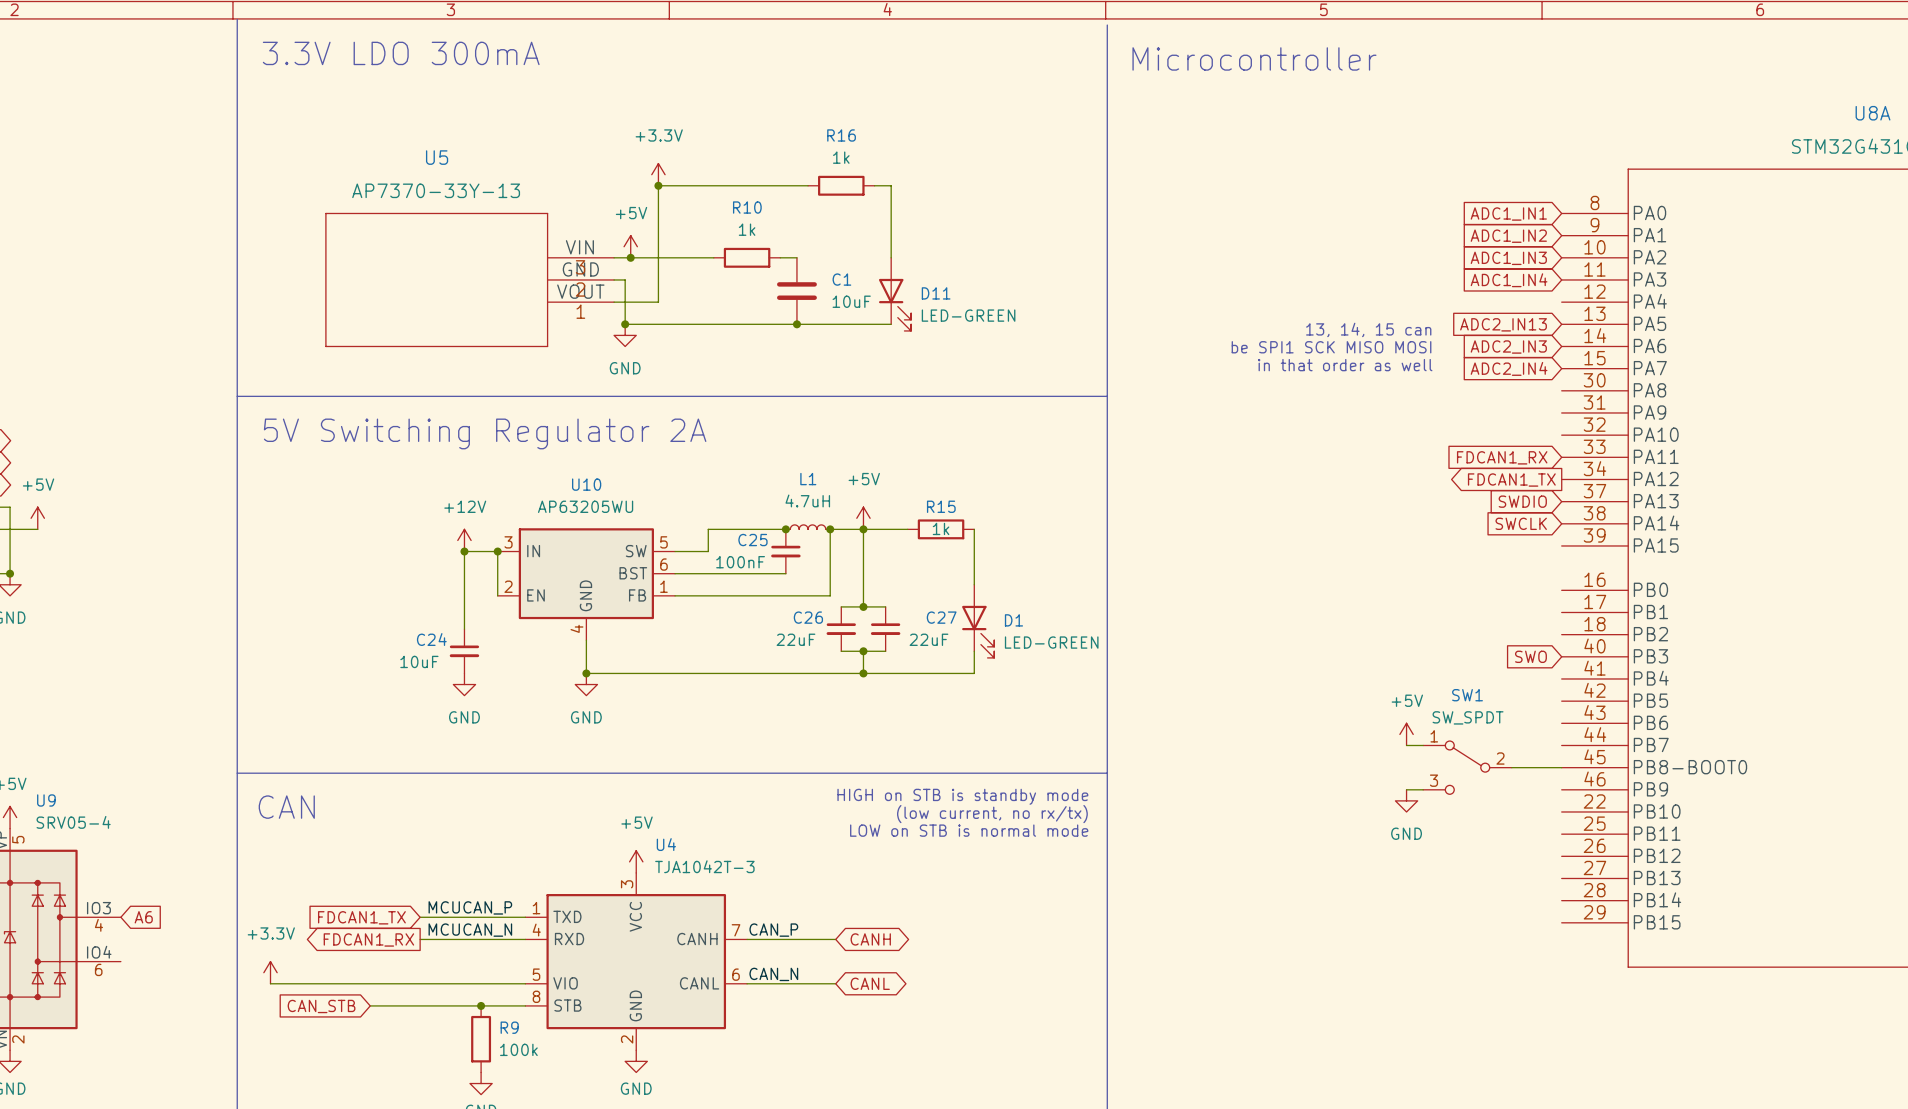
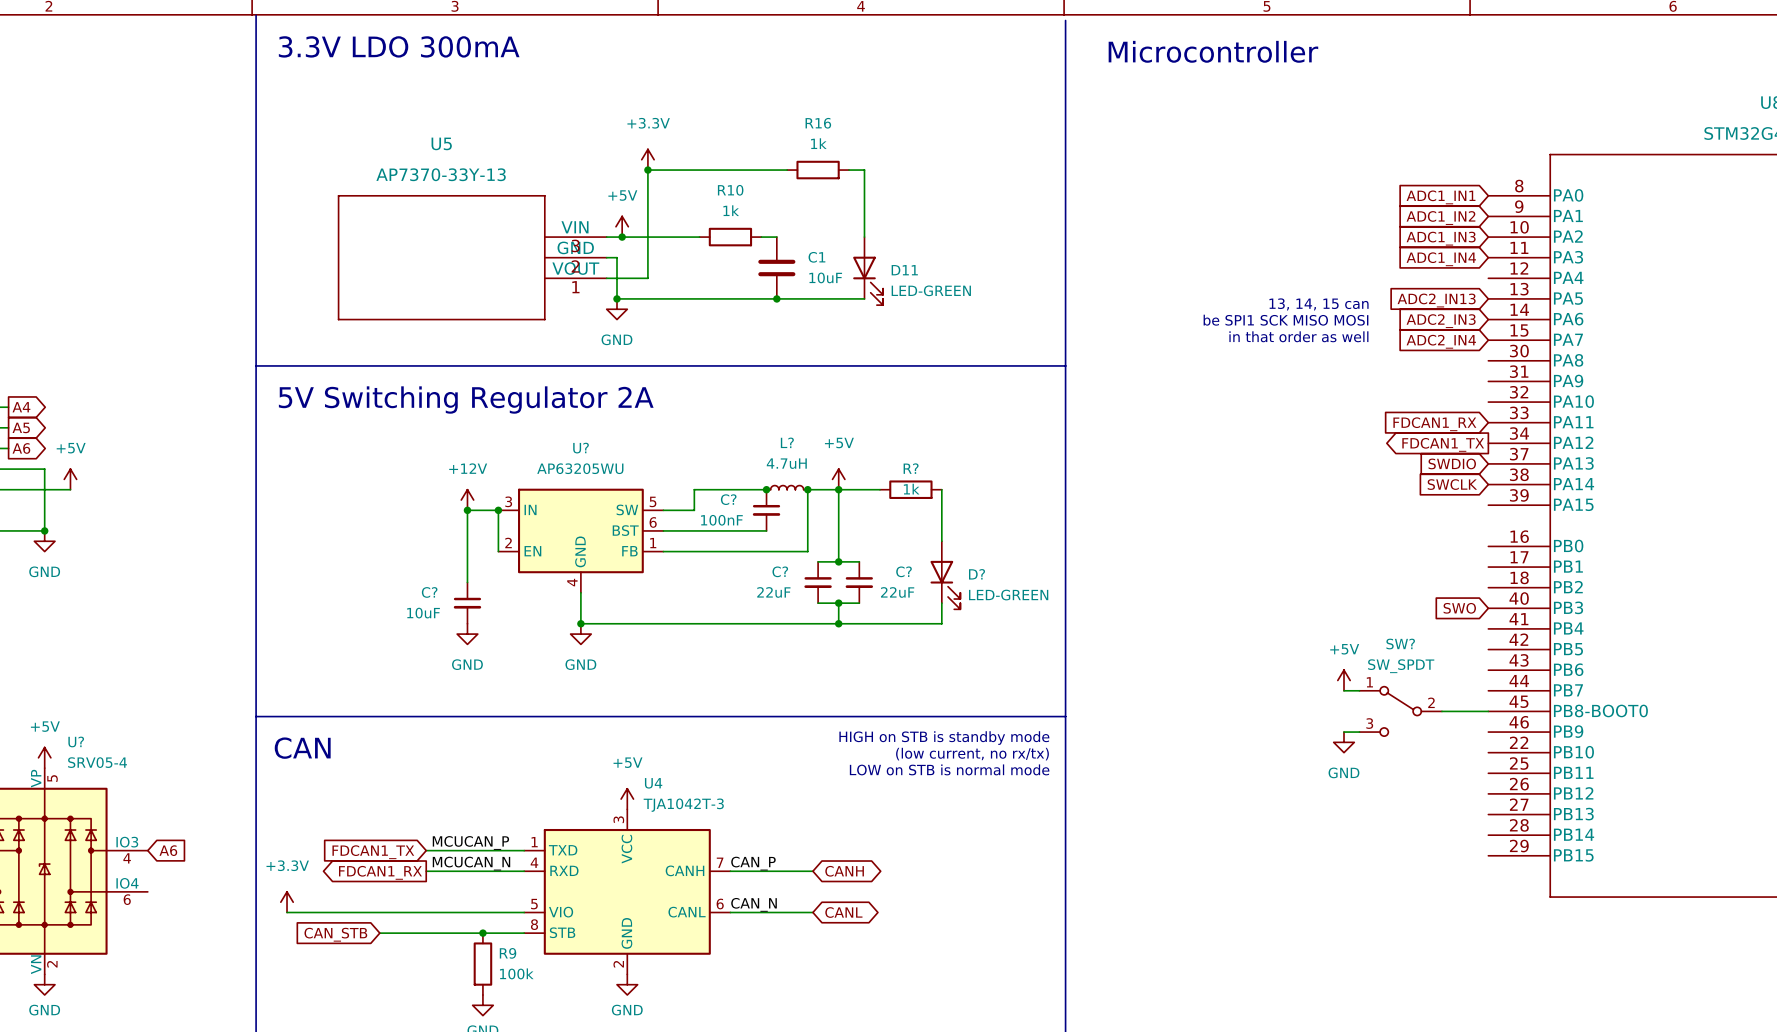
L1 name: L1 (808, 479) -> L? (787, 442)
U10 name: U10 (586, 484) -> U? (581, 448)
R15 name: R15 (941, 506) -> R? (911, 468)
C25 name: C25 (752, 540) -> C? (728, 499)
C26 name: C26 (808, 617) -> C? (780, 571)
C27 name: C27 (941, 617) -> C? (904, 571)
D1 name: D1 (1013, 620) -> D? (977, 574)
C24 name: C24 (431, 639) -> C? (429, 592)
SW1 name: SW1 (1467, 695) -> SW? (1400, 644)
U9 name: U9 (46, 800) -> U? (76, 741)

